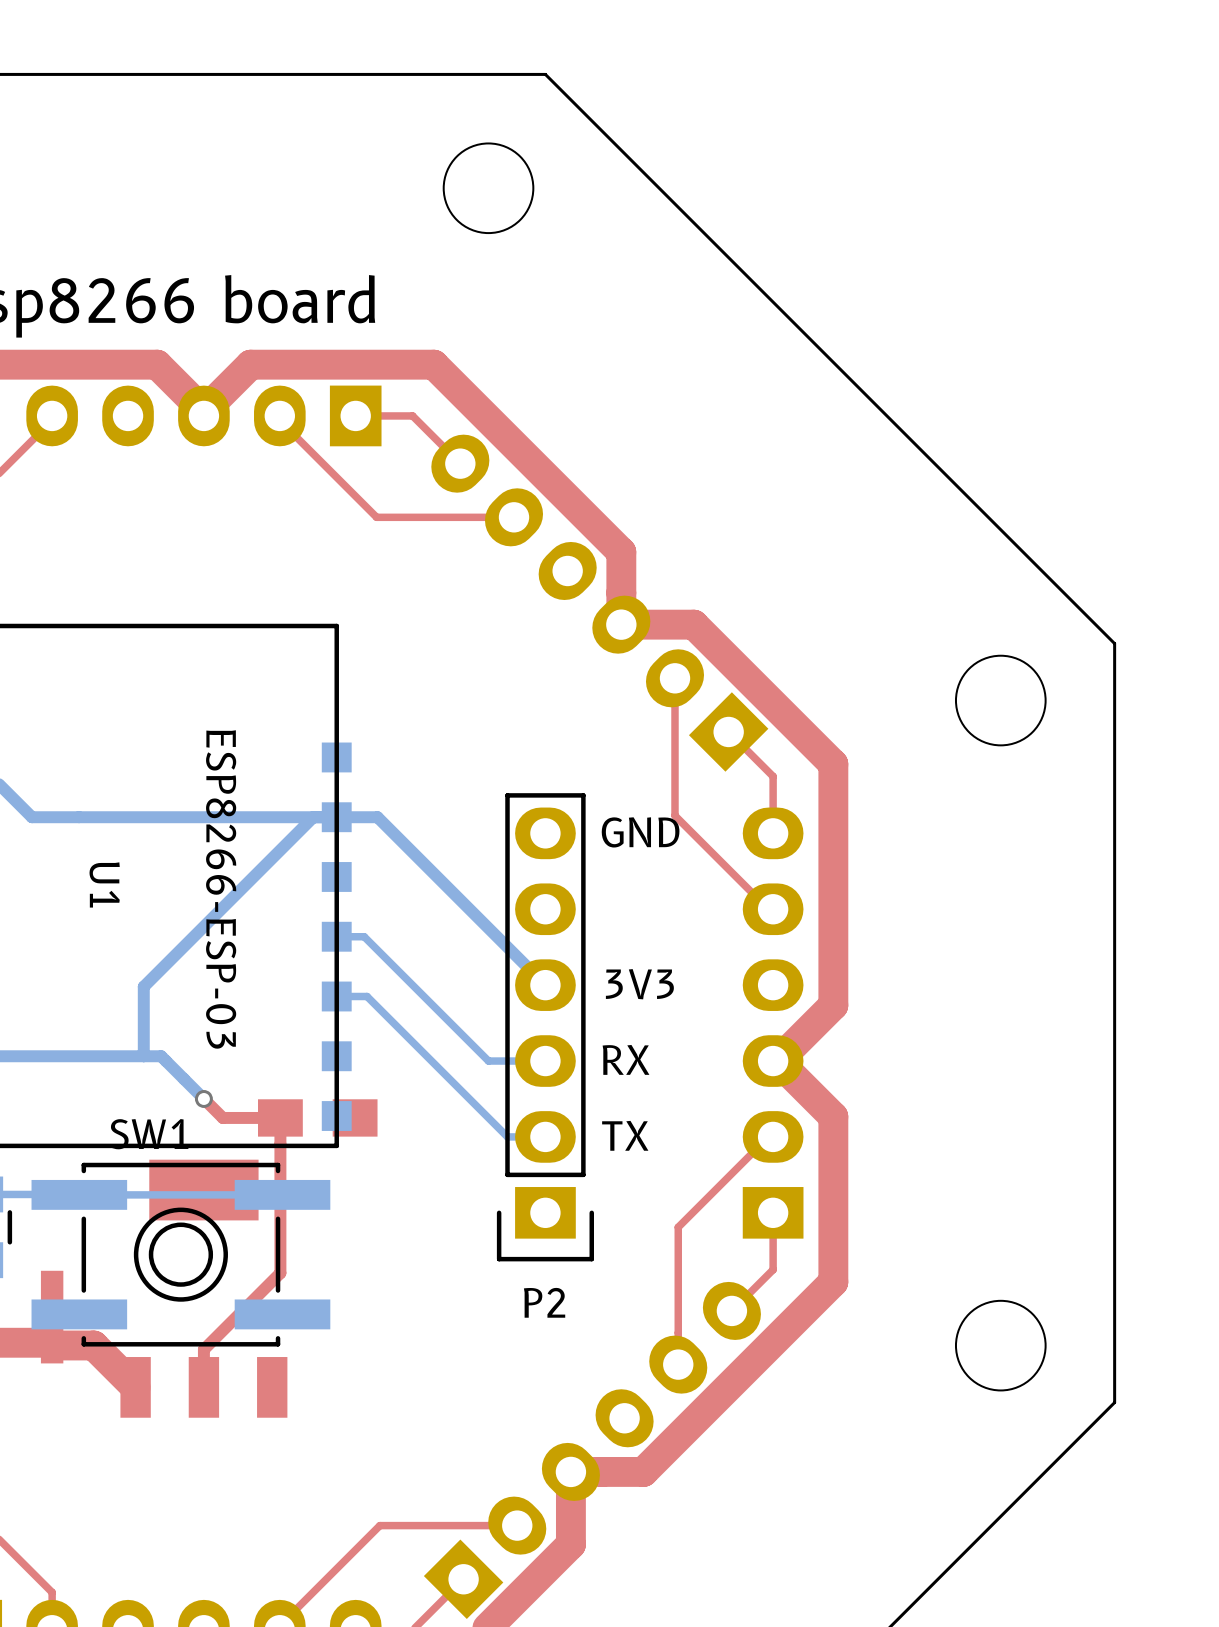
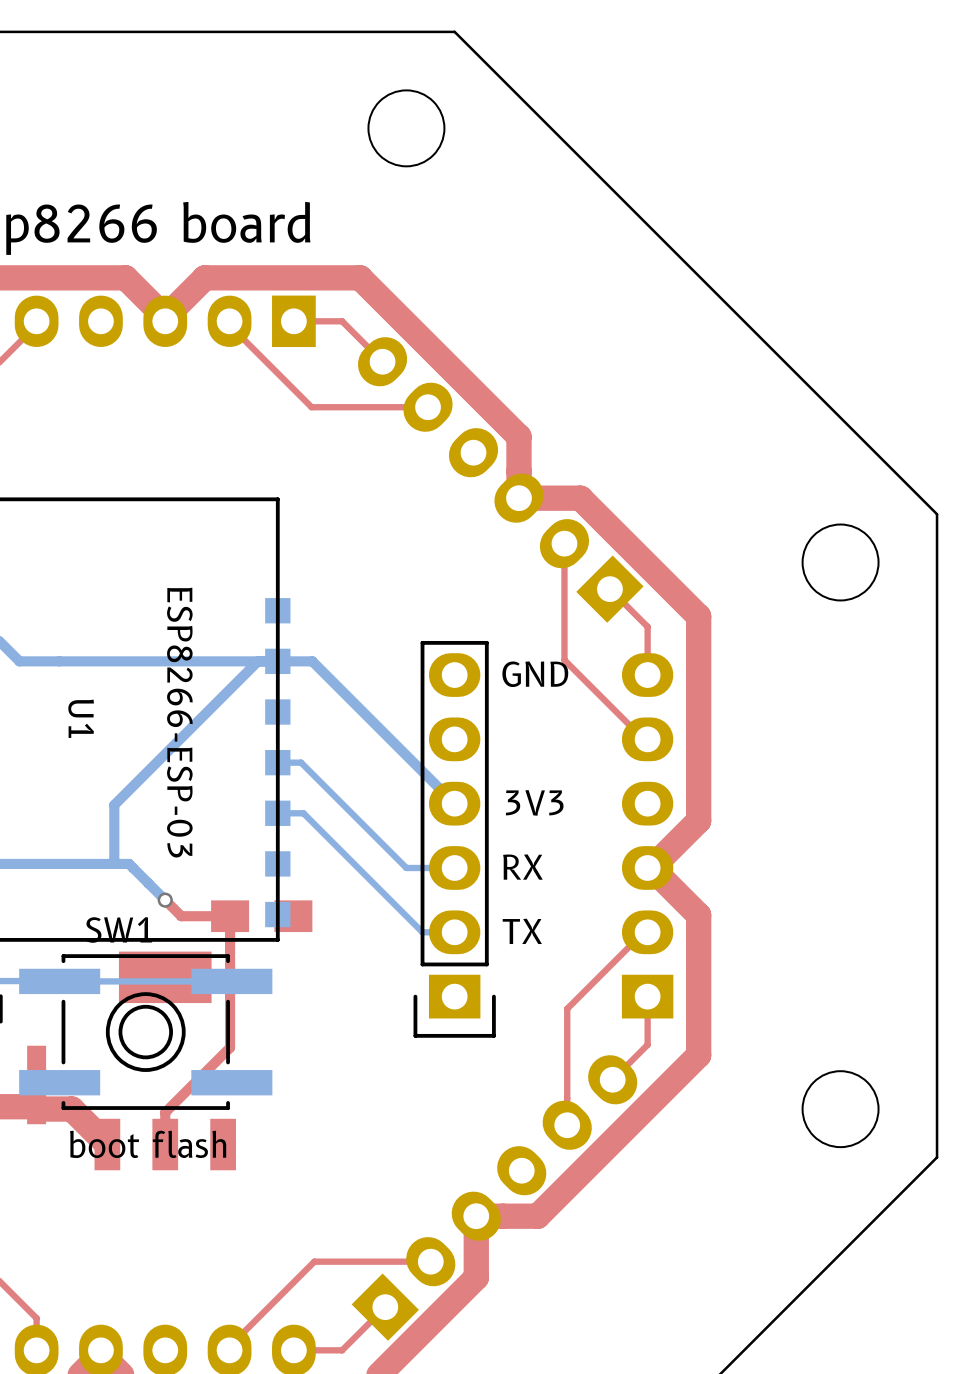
P2 name: P2 (544, 1302) -> none
text: none -> boot flash (148, 1144)

